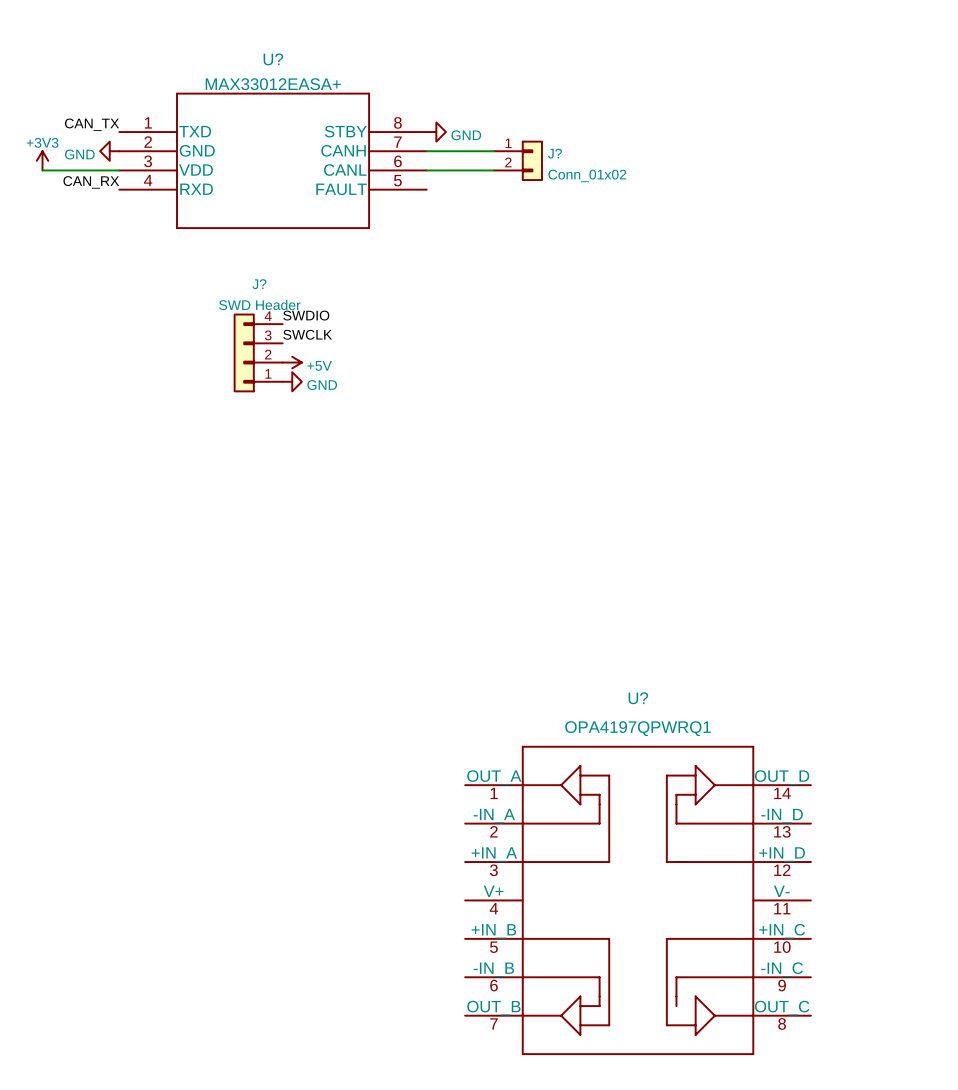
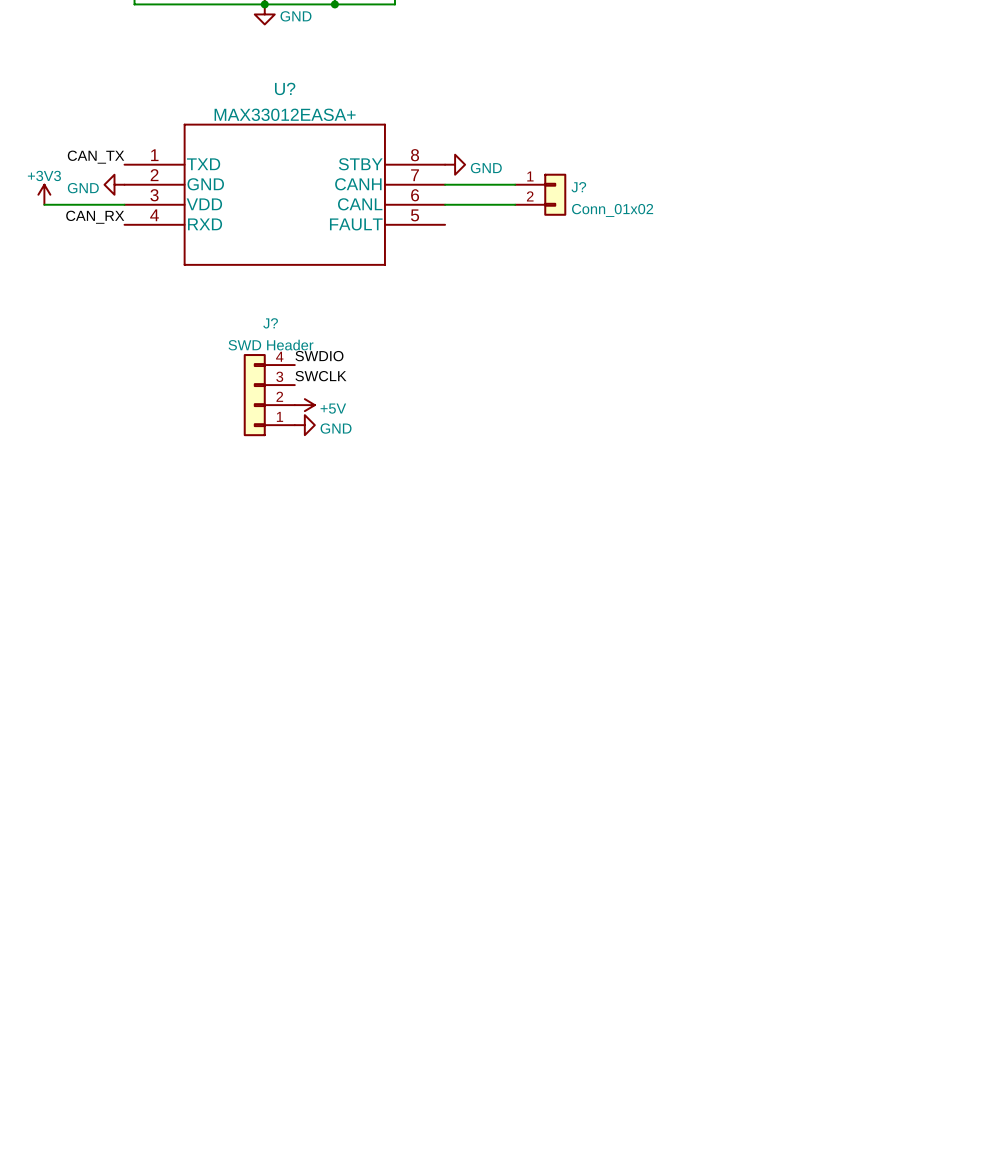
U?: OPA4197QPWRQ1 (638, 900) -> none

